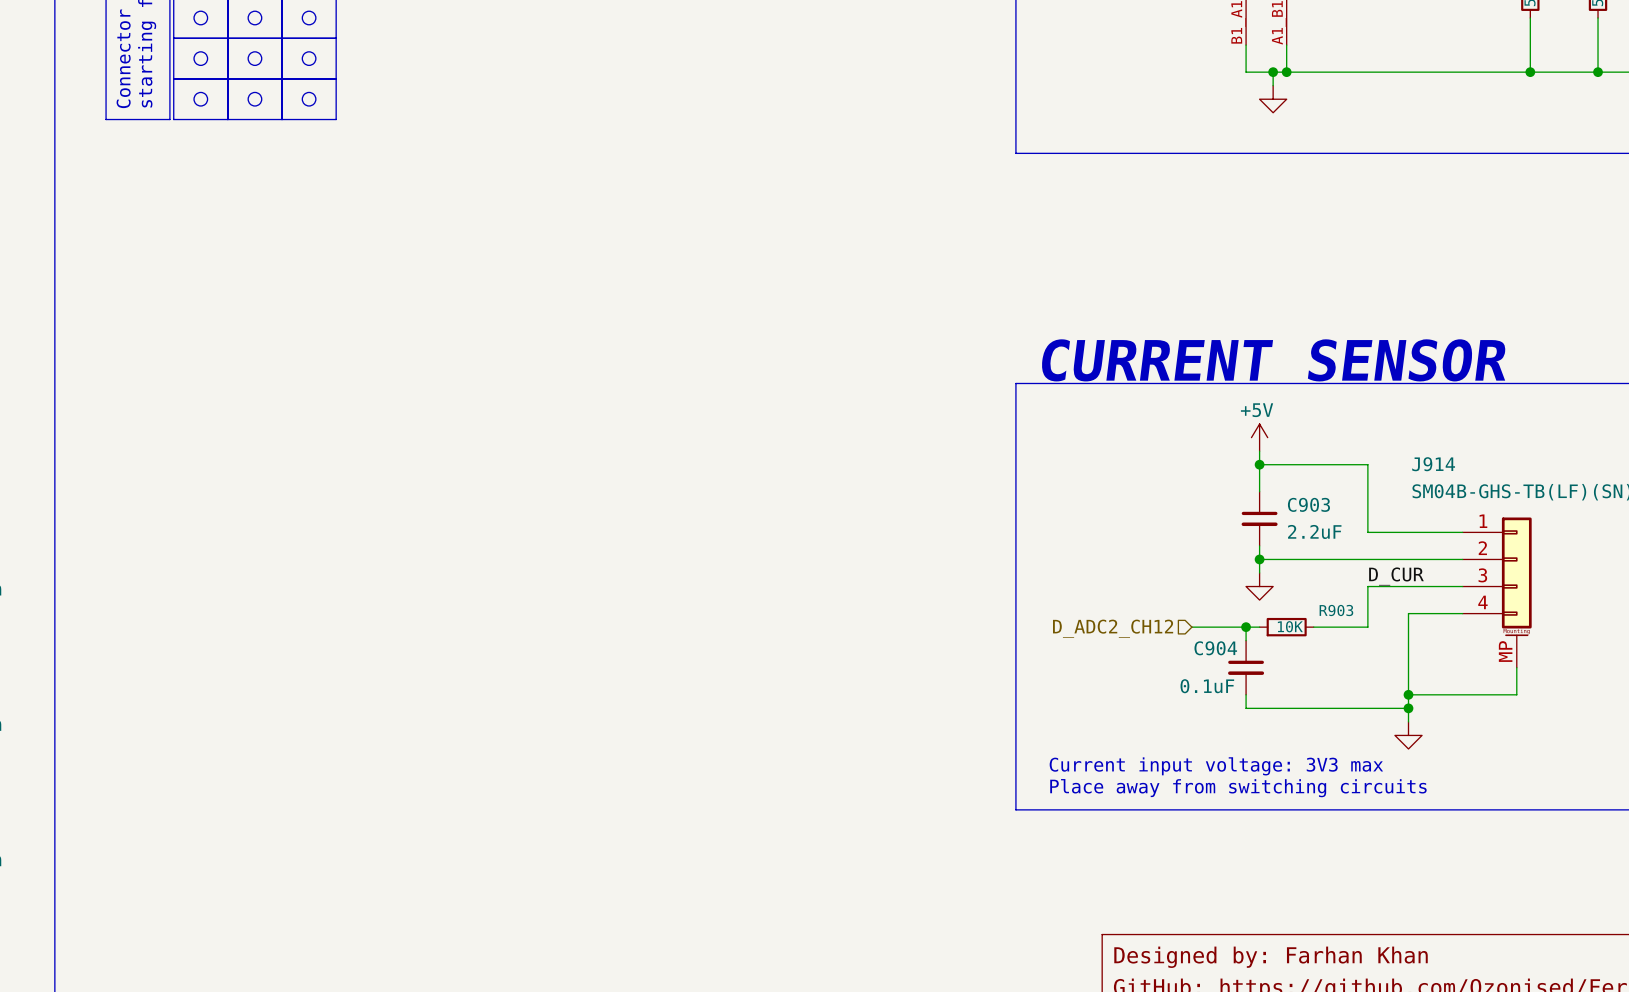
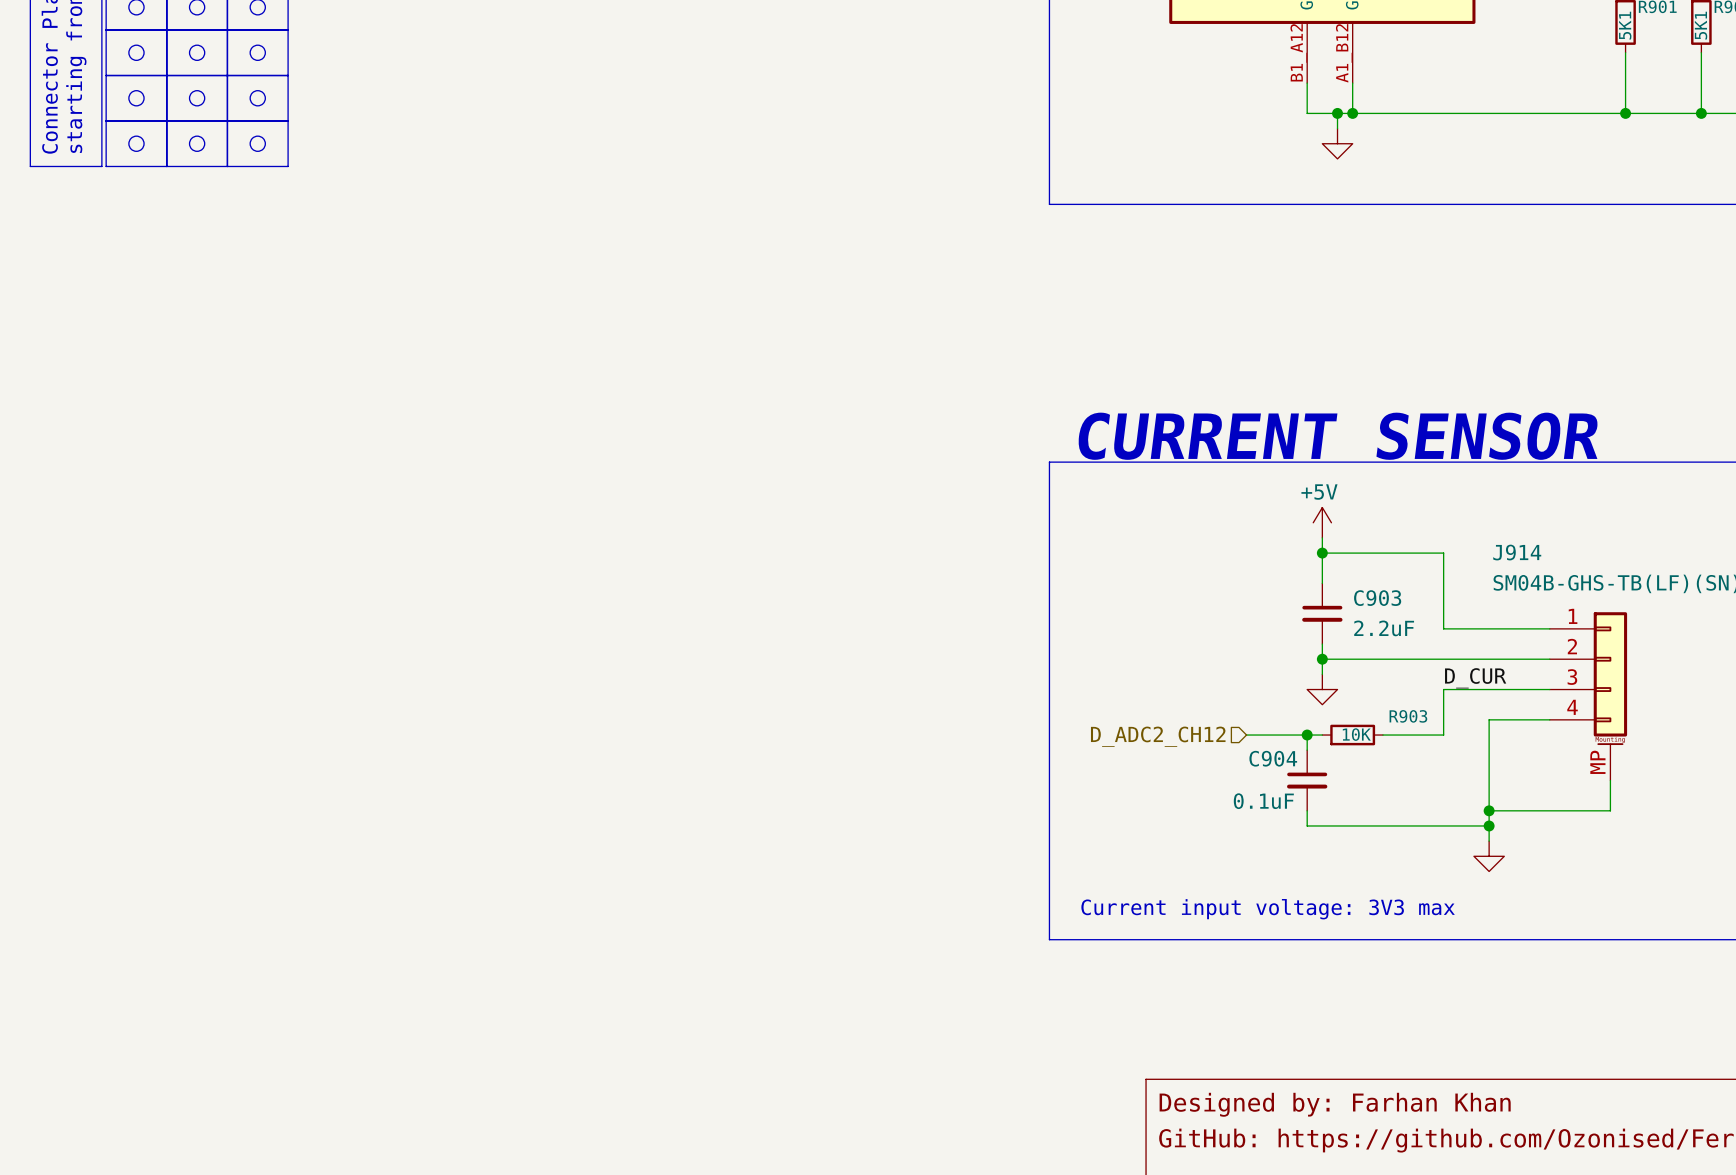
text position: Current input voltage: 3V3 max (1216, 766) -> Current input voltage: 3V3 max (1268, 909)
text: Place away from switching circuits (1238, 788) -> none

